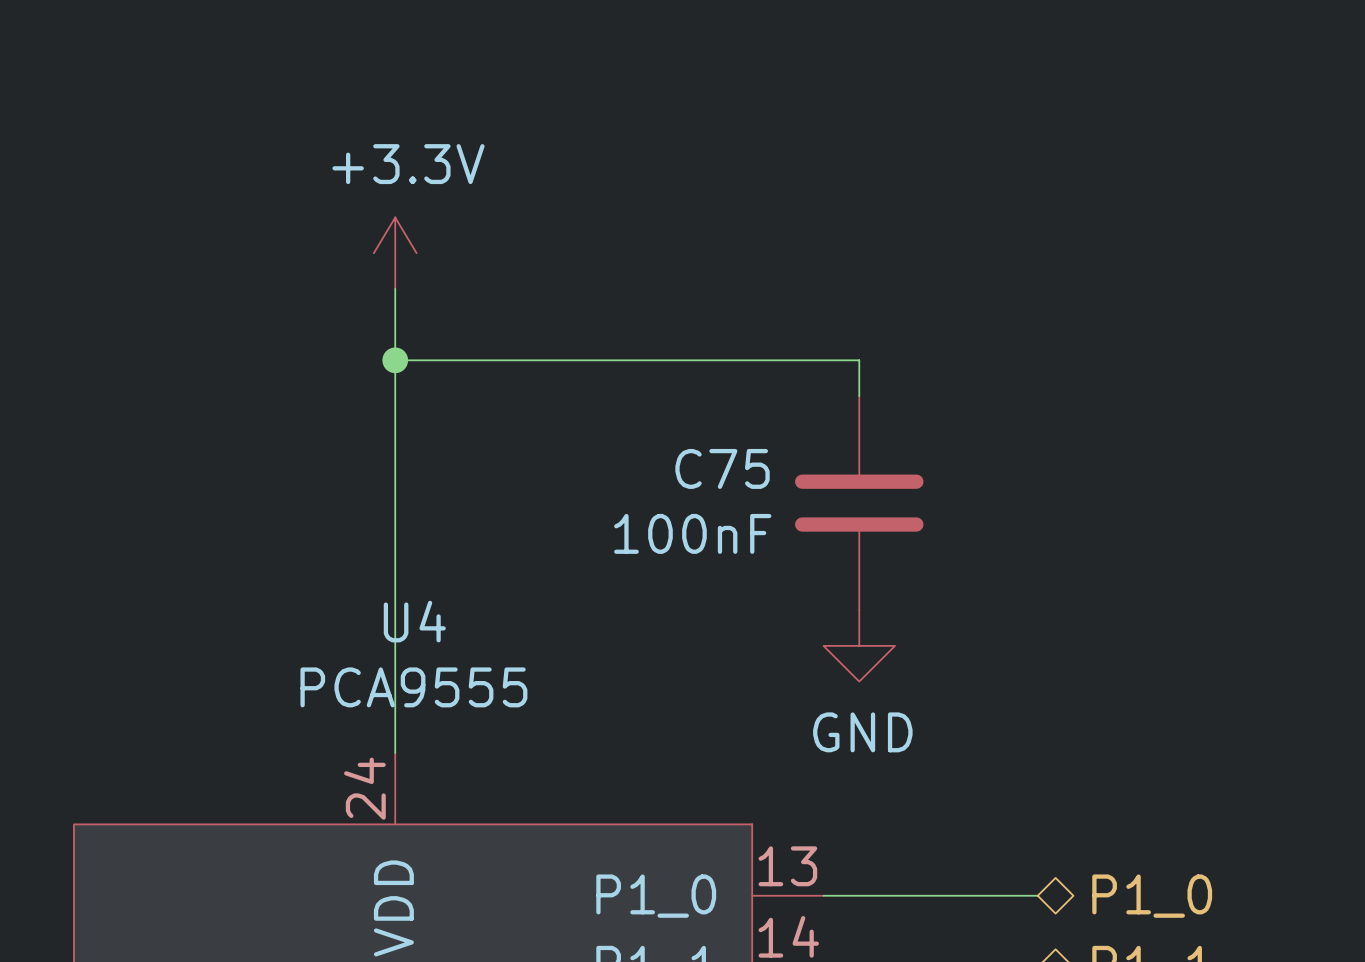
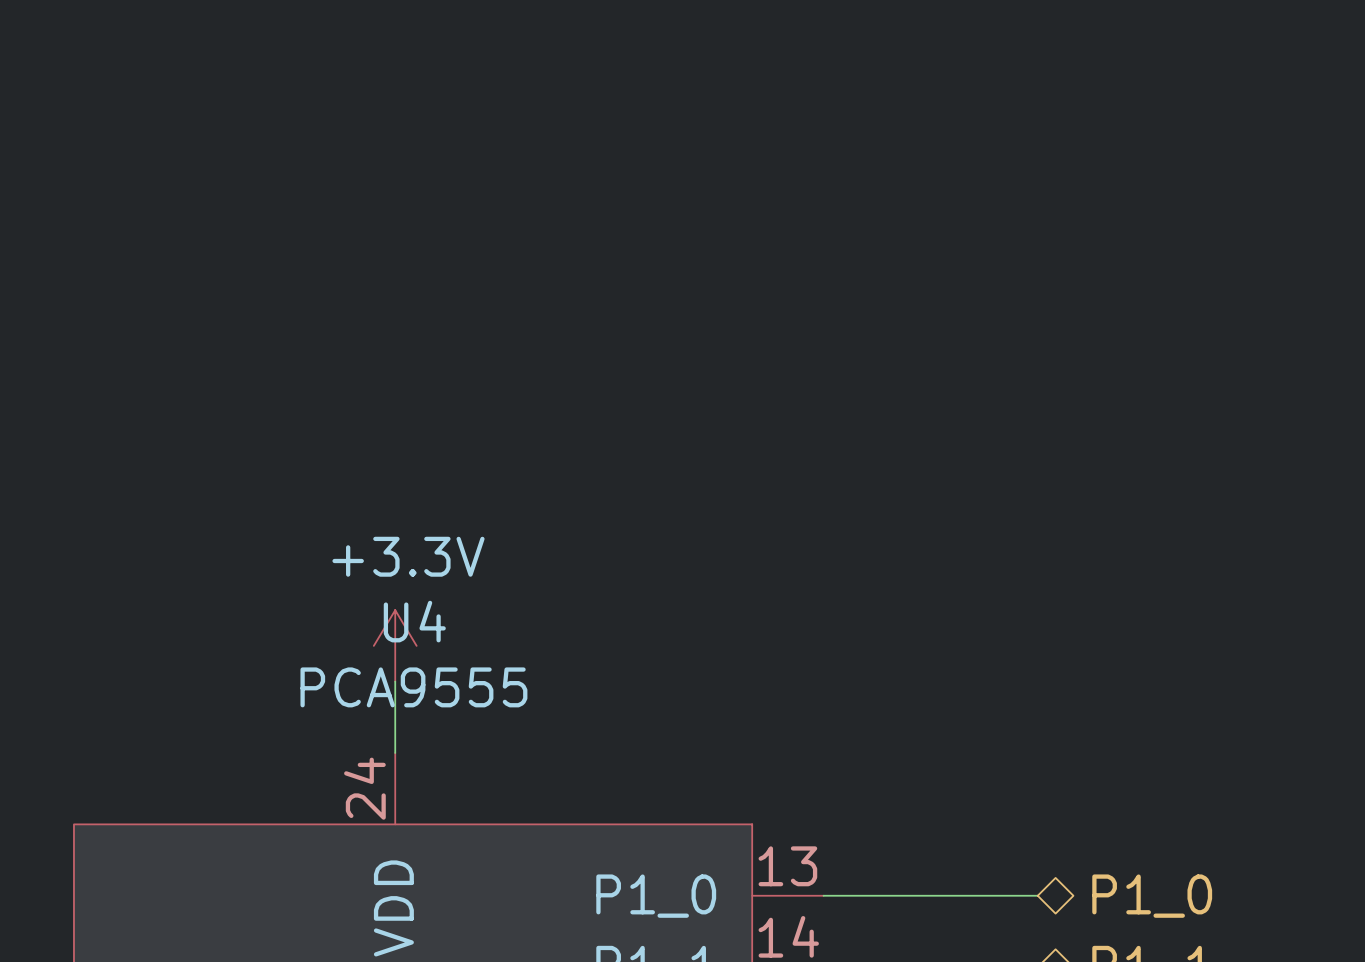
power symbol position: +3.3V (395, 253) -> +3.3V (395, 645)
wire: (395, 288) (395, 681) -> none
wire: (395, 360) (859, 360) (859, 396) -> none
junction: (395, 360) -> none
C75: 100nF (859, 503) -> none
power symbol: GND (859, 645) -> none

